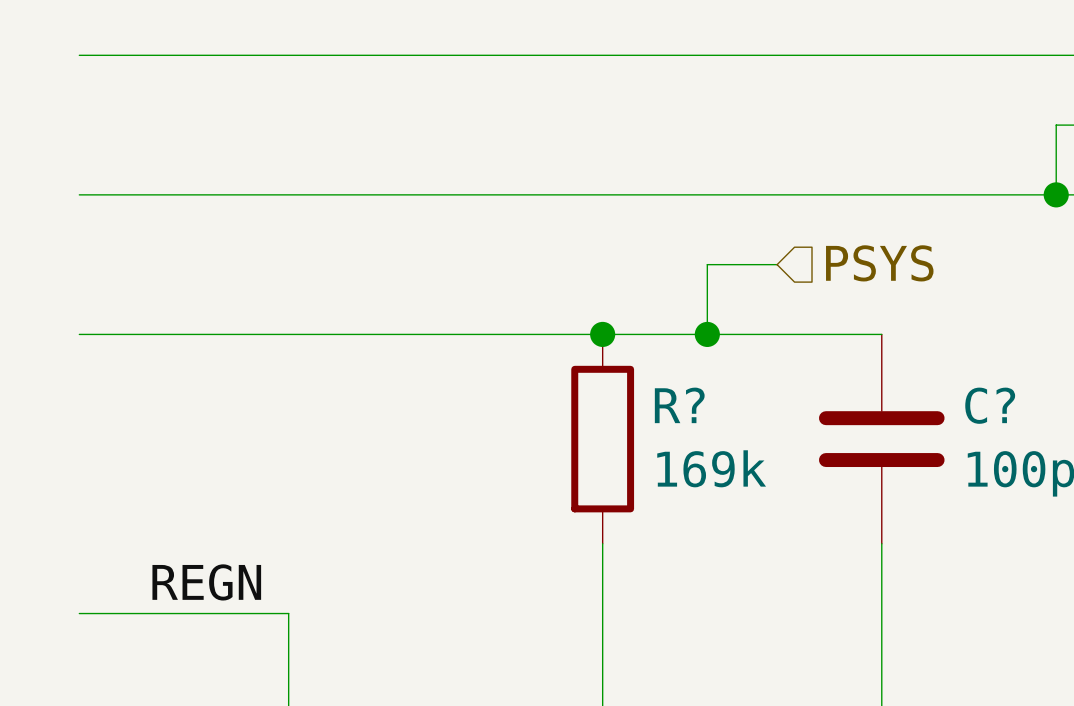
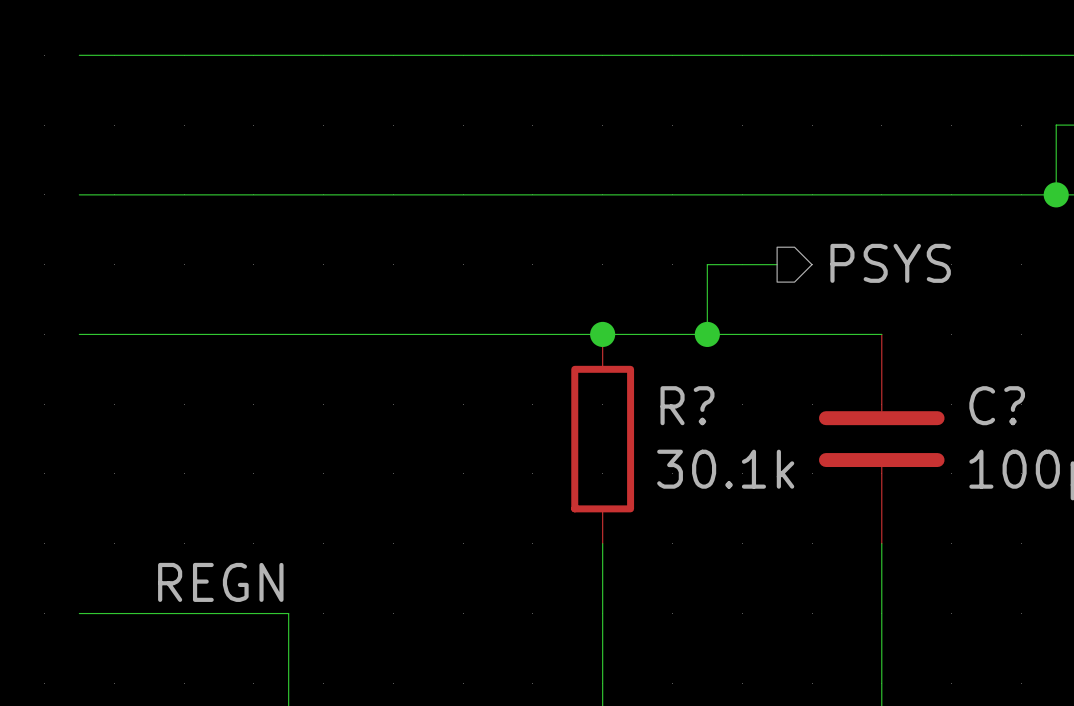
hierarchical label shape: input (879, 263) -> output (890, 263)
R? value: 169k (711, 468) -> 30.1k (725, 469)

